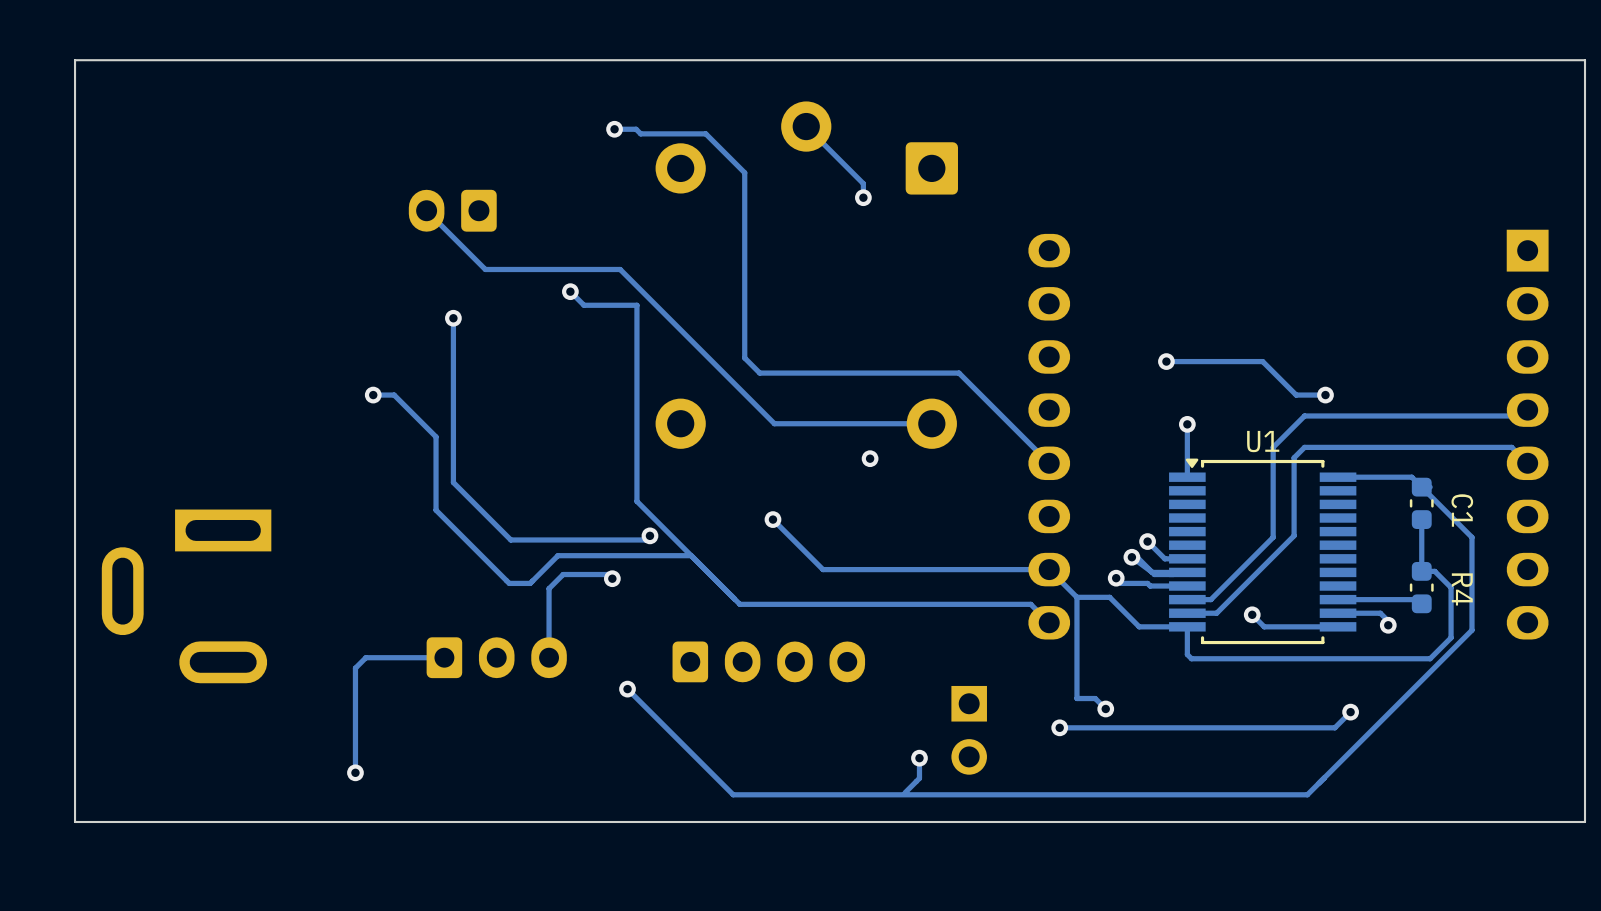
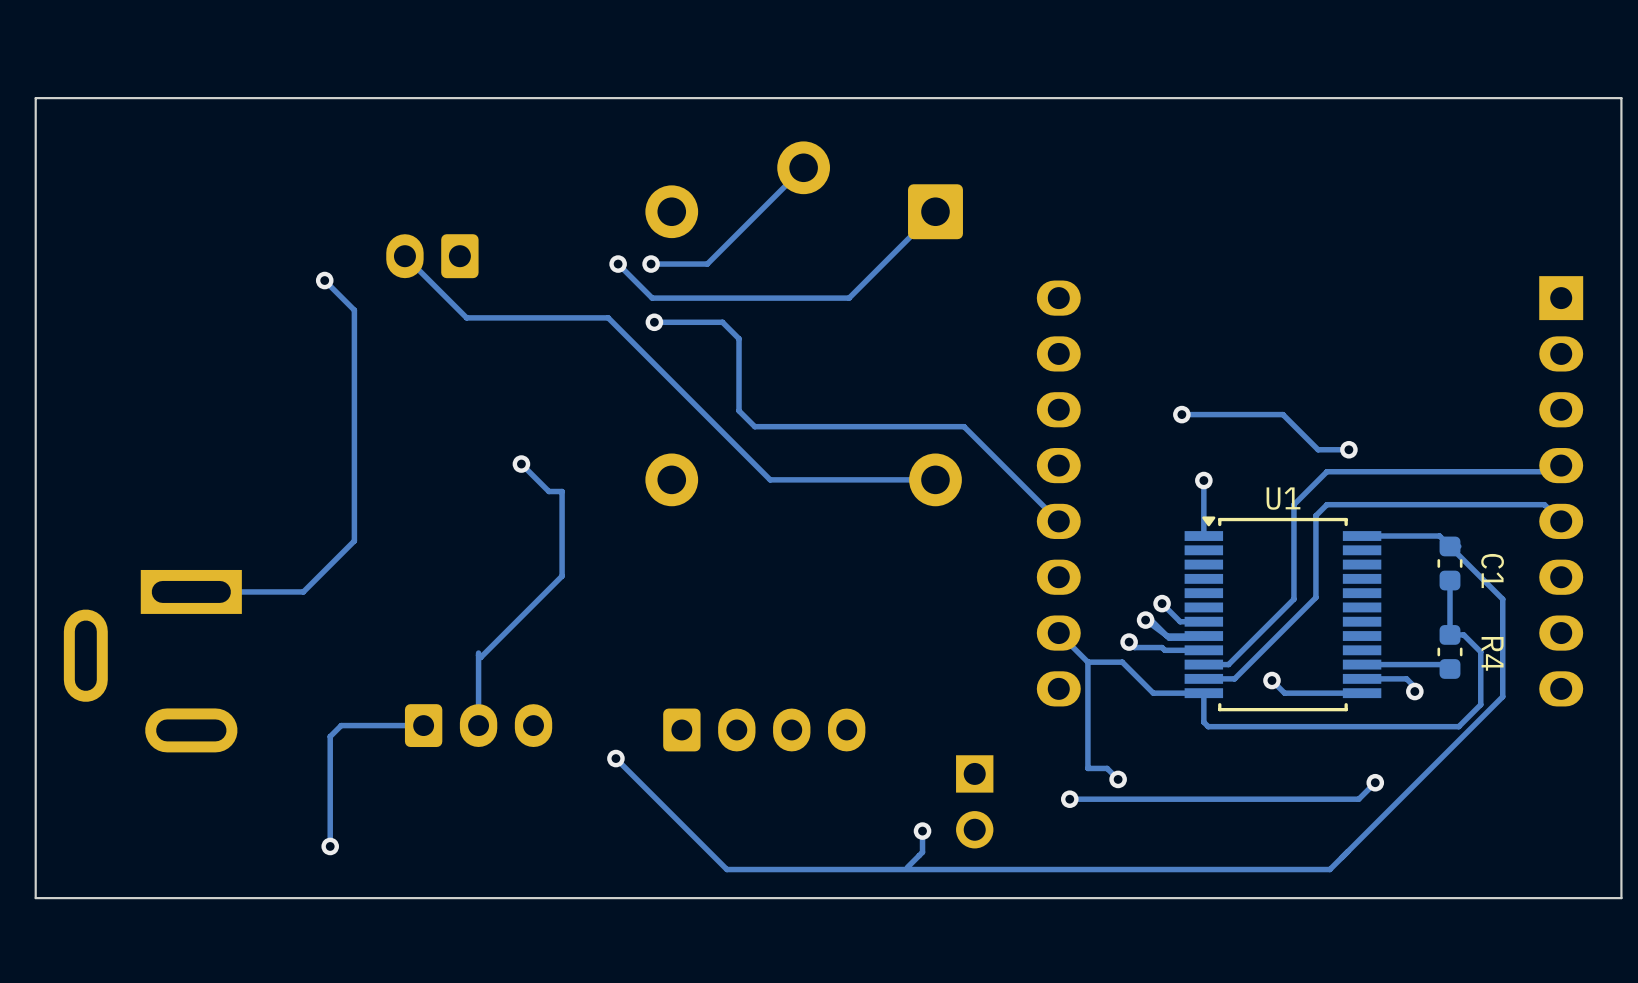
track: (806, 126) (863, 183) (863, 197) -> (803, 167) (707, 264) (651, 264)
track: (614, 129) (636, 129) (640, 133) (705, 133) (744, 172) (744, 289) -> (654, 322) (722, 322) (739, 338)
via: (614, 129) -> none
track: none -> (935, 211) (849, 298) (652, 298) (618, 264)
via: (863, 197) -> none
via: none -> (618, 264)
via: none -> (651, 264)
track: none -> (324, 280) (354, 310) (354, 540) (303, 591) (191, 591)
via: none -> (324, 280)
via: none -> (654, 322)
track: (570, 291) (584, 305) (636, 305) (636, 501) (739, 604) (1030, 604) (1049, 622) -> none
via: (570, 291) -> none
track: (453, 318) (453, 482) (510, 539) (645, 539) (649, 535) -> none
via: (453, 318) -> none
track: (373, 395) (394, 395) (436, 436) (436, 510) (509, 583) (530, 583) (557, 555) (691, 555) -> none
via: (373, 395) -> none
track: none -> (521, 464) (548, 491) (562, 491) (562, 576) (480, 657) (478, 655)
via: none -> (521, 464)
via: (870, 458) -> none
track: (772, 519) (823, 569) (1049, 569) -> none
via: (772, 519) -> none
via: (649, 535) -> none
track: (612, 578) (608, 574) (563, 574) (549, 588) (549, 657) -> none
via: (612, 578) -> none
track: none -> (478, 653) (478, 725)

